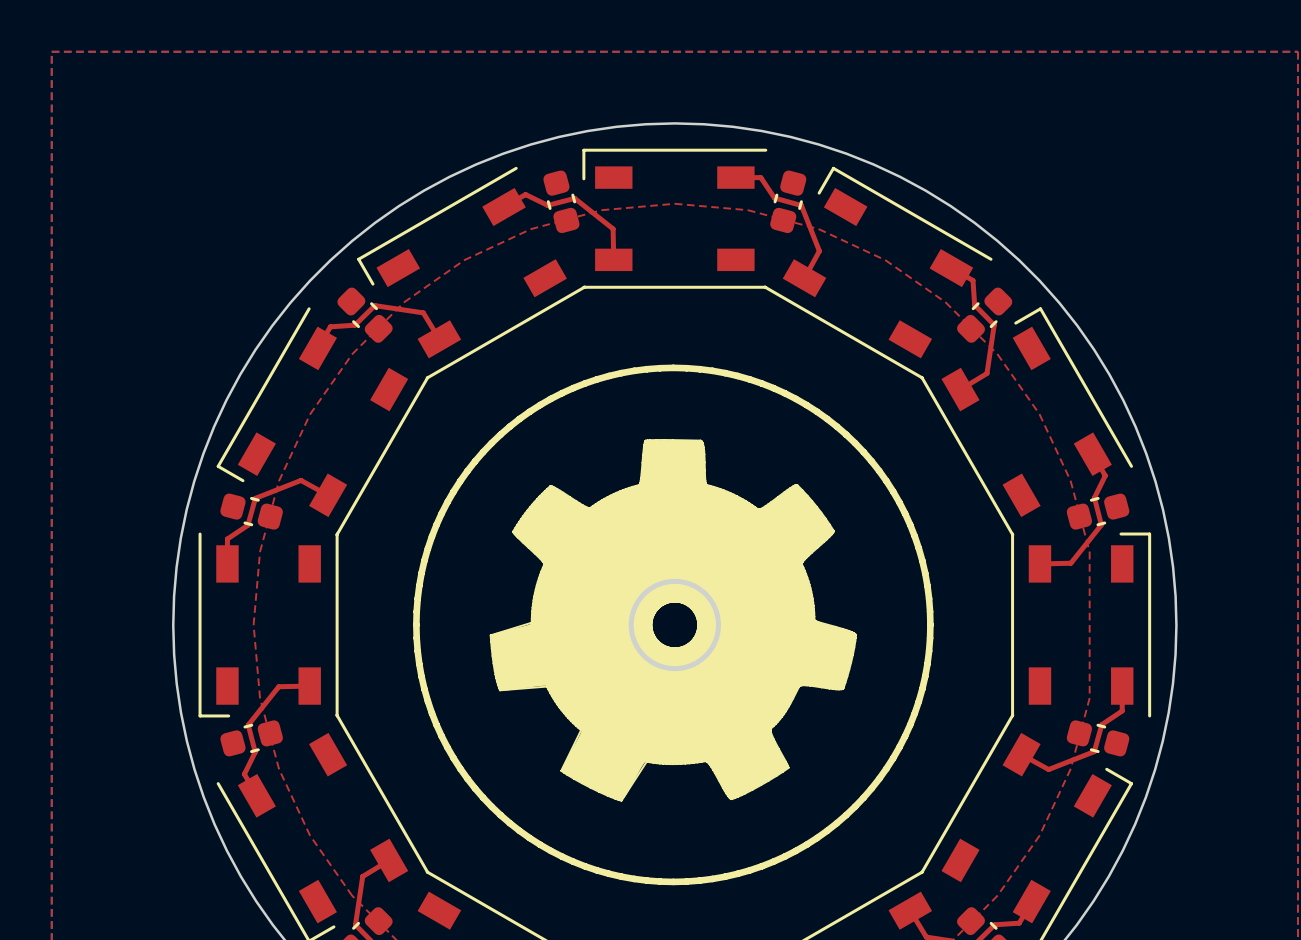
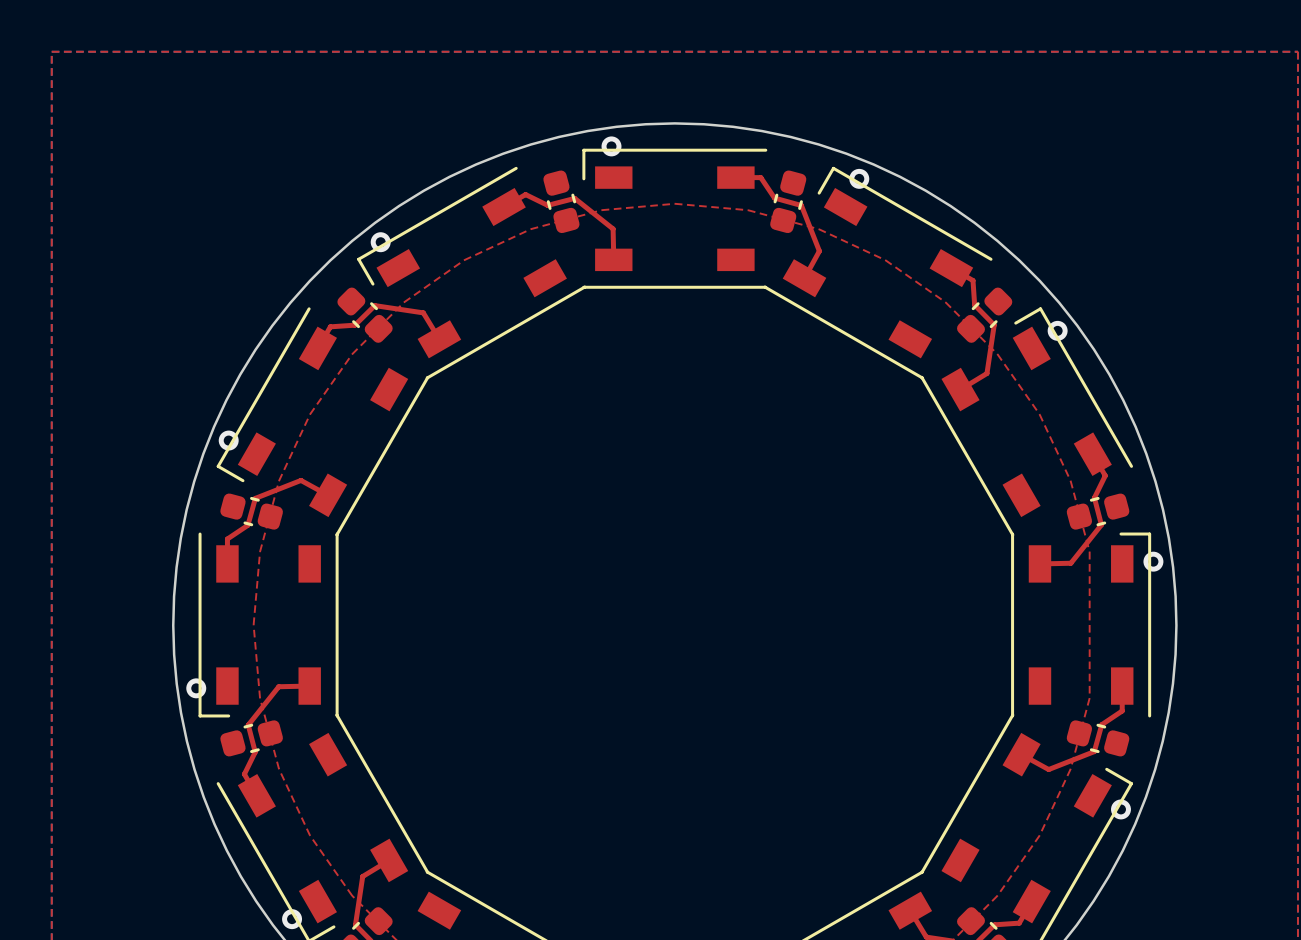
via: none -> (611, 146)
via: none -> (859, 178)
via: none -> (380, 242)
via: none -> (1057, 330)
line: (673, 367) (725, 373) (773, 388) (817, 411) (855, 443) (886, 481) (910, 524) (925, 573) (930, 624) (925, 676) (910, 724) (886, 768) (855, 806) (817, 838) (773, 861) (725, 876) (673, 881) (621, 876) (573, 861) (529, 838) (491, 806) (460, 768) (436, 724) (421, 676) (416, 624) (421, 573) (436, 524) (460, 481) (491, 443) (529, 411) (573, 388) (621, 373) (673, 367) -> none
via: none -> (228, 440)
drawing: [490, 440, 856, 801] -> none
line: (645, 440) (701, 441) (704, 450) (706, 484) -> none
line: (645, 441) (639, 484) -> none
line: (796, 484) (758, 509) -> none
line: (639, 485) (613, 494) (590, 508) -> none
line: (706, 485) (733, 494) (758, 509) -> none
line: (797, 485) (816, 506) (833, 530) -> none
line: (550, 486) (589, 508) -> none
line: (550, 486) (529, 507) (513, 531) -> none
line: (513, 531) (544, 564) -> none
line: (833, 531) (801, 563) -> none
via: none -> (1153, 561)
line: (544, 564) (534, 592) (531, 622) (490, 635) (491, 641) (494, 670) (499, 690) (546, 686) (561, 710) (581, 730) (561, 770) (590, 787) (621, 800) (646, 761) (673, 764) (706, 761) (731, 799) (752, 789) (788, 768) -> none
line: (801, 564) (811, 591) (814, 620) -> none
round board edge: [628, 578, 721, 672] -> none
line: (672, 601) (663, 604) (656, 610) (652, 617) (651, 627) (654, 636) (659, 642) (667, 647) (677, 648) (685, 645) (692, 639) (697, 631) (698, 622) (695, 613) (689, 606) (681, 602) (672, 601) -> none
line: (814, 620) (855, 634) -> none
line: (855, 635) (851, 662) (843, 688) (800, 685) (783, 714) (770, 728) (773, 738) (788, 767) -> none
via: none -> (196, 688)
via: none -> (1120, 809)
via: none -> (292, 919)

